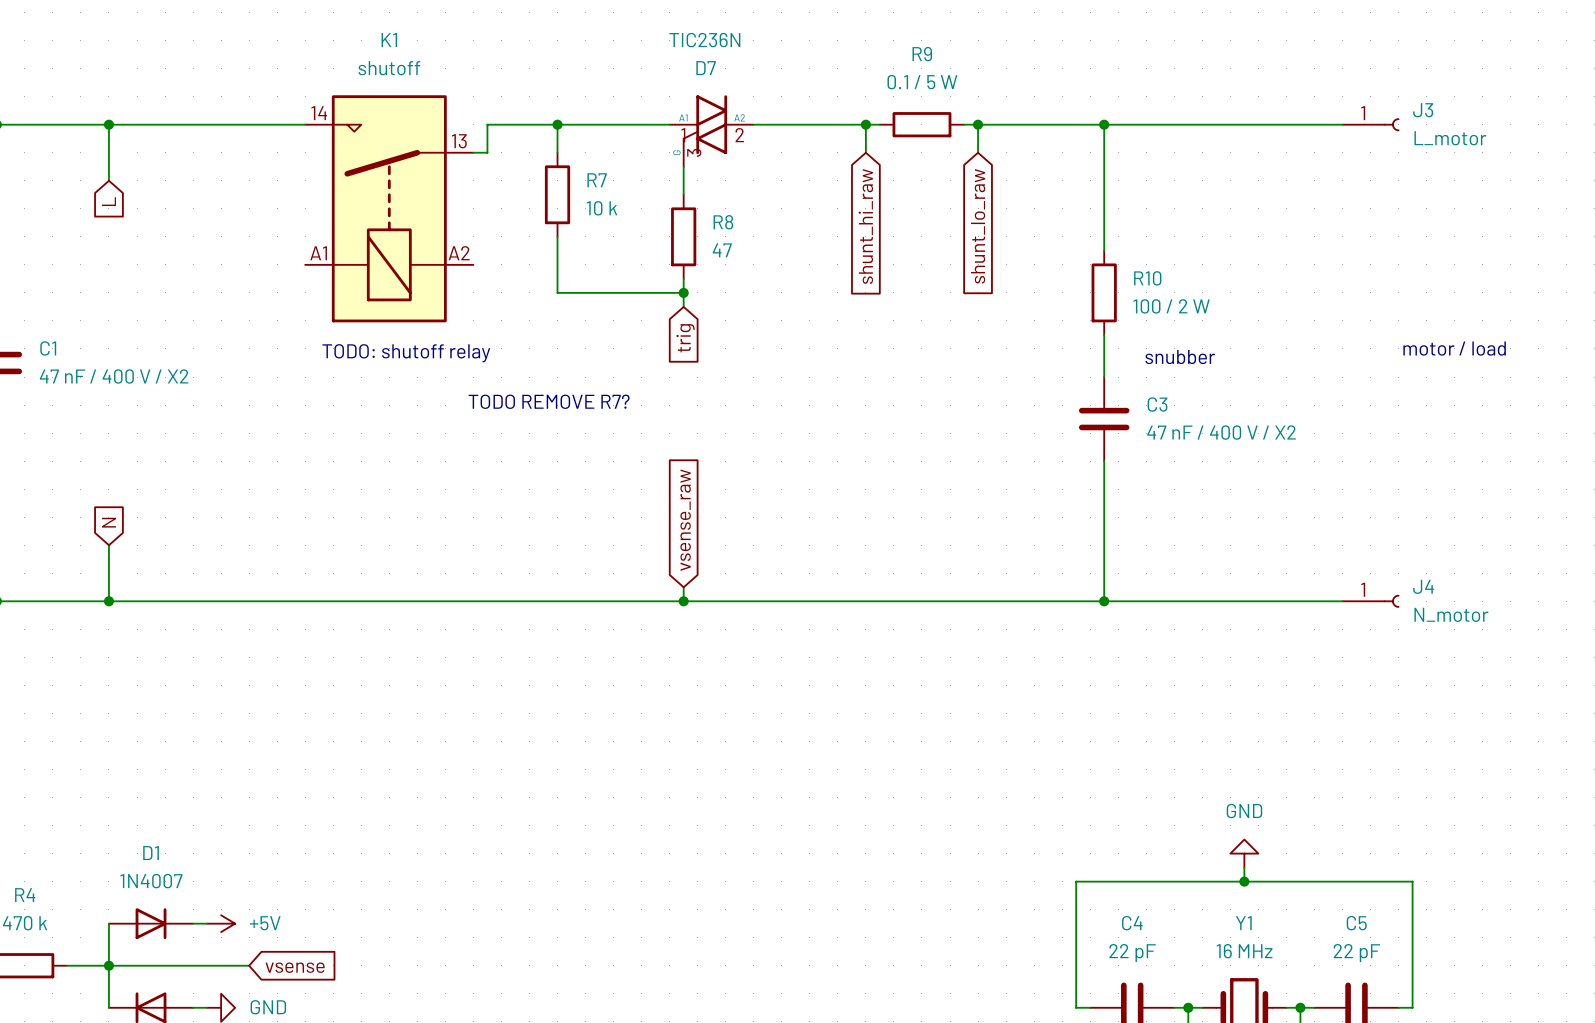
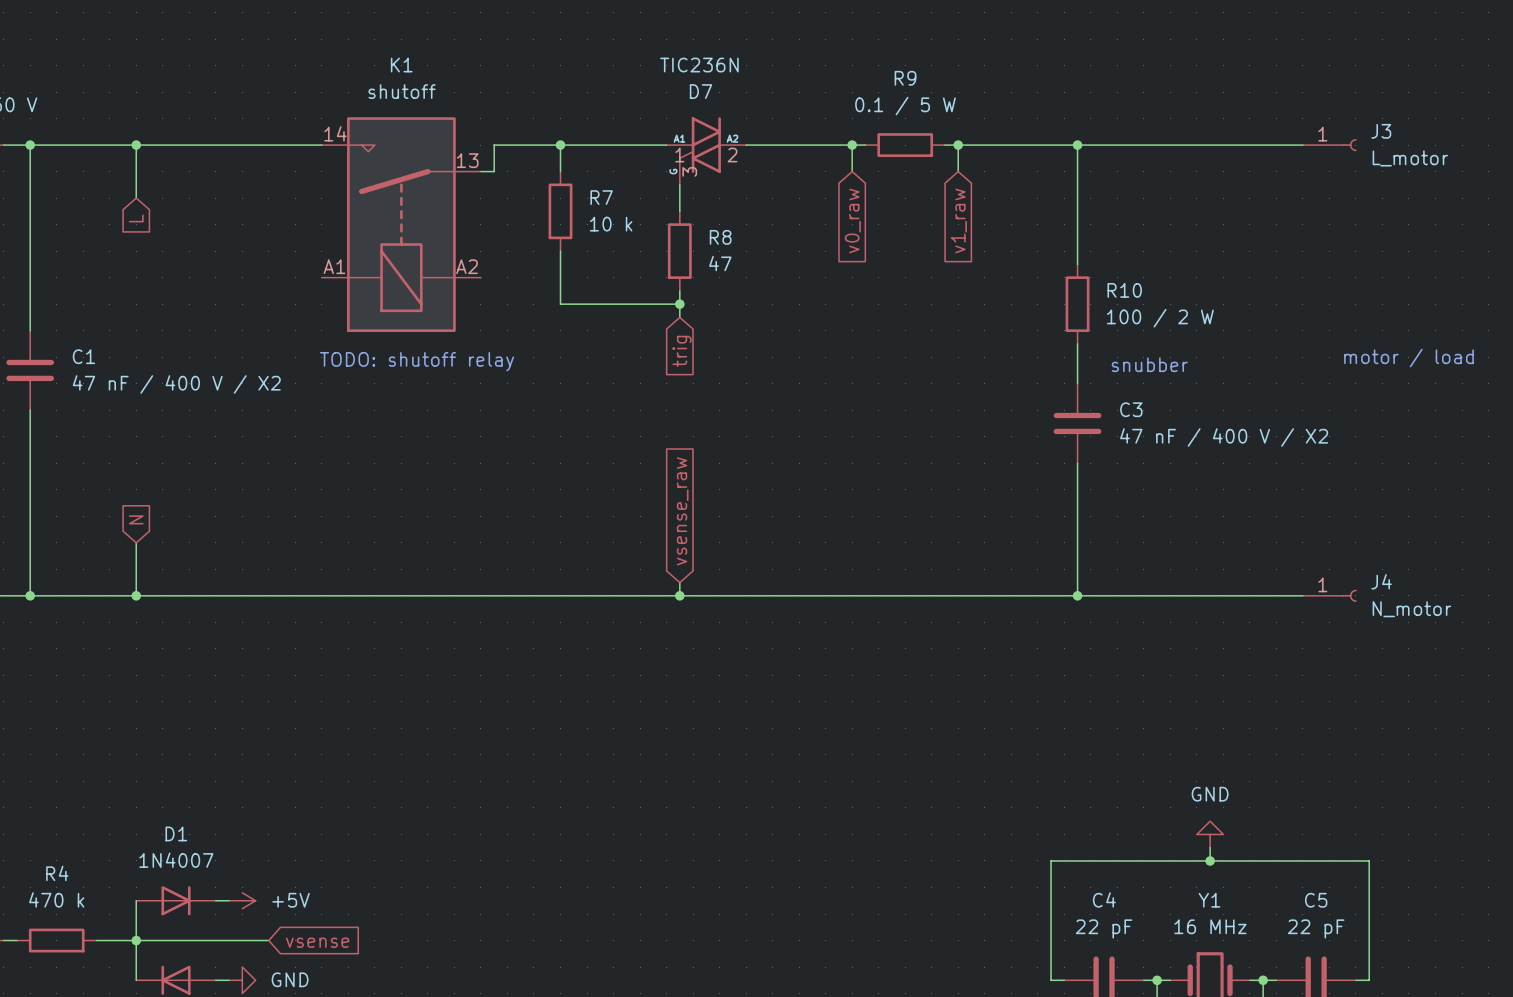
global label: shunt_hi_raw (865, 226) -> v0_raw (852, 221)
global label: shunt_lo_raw (978, 226) -> v1_raw (958, 221)
text: TODO REMOVE R7? (549, 401) -> none

